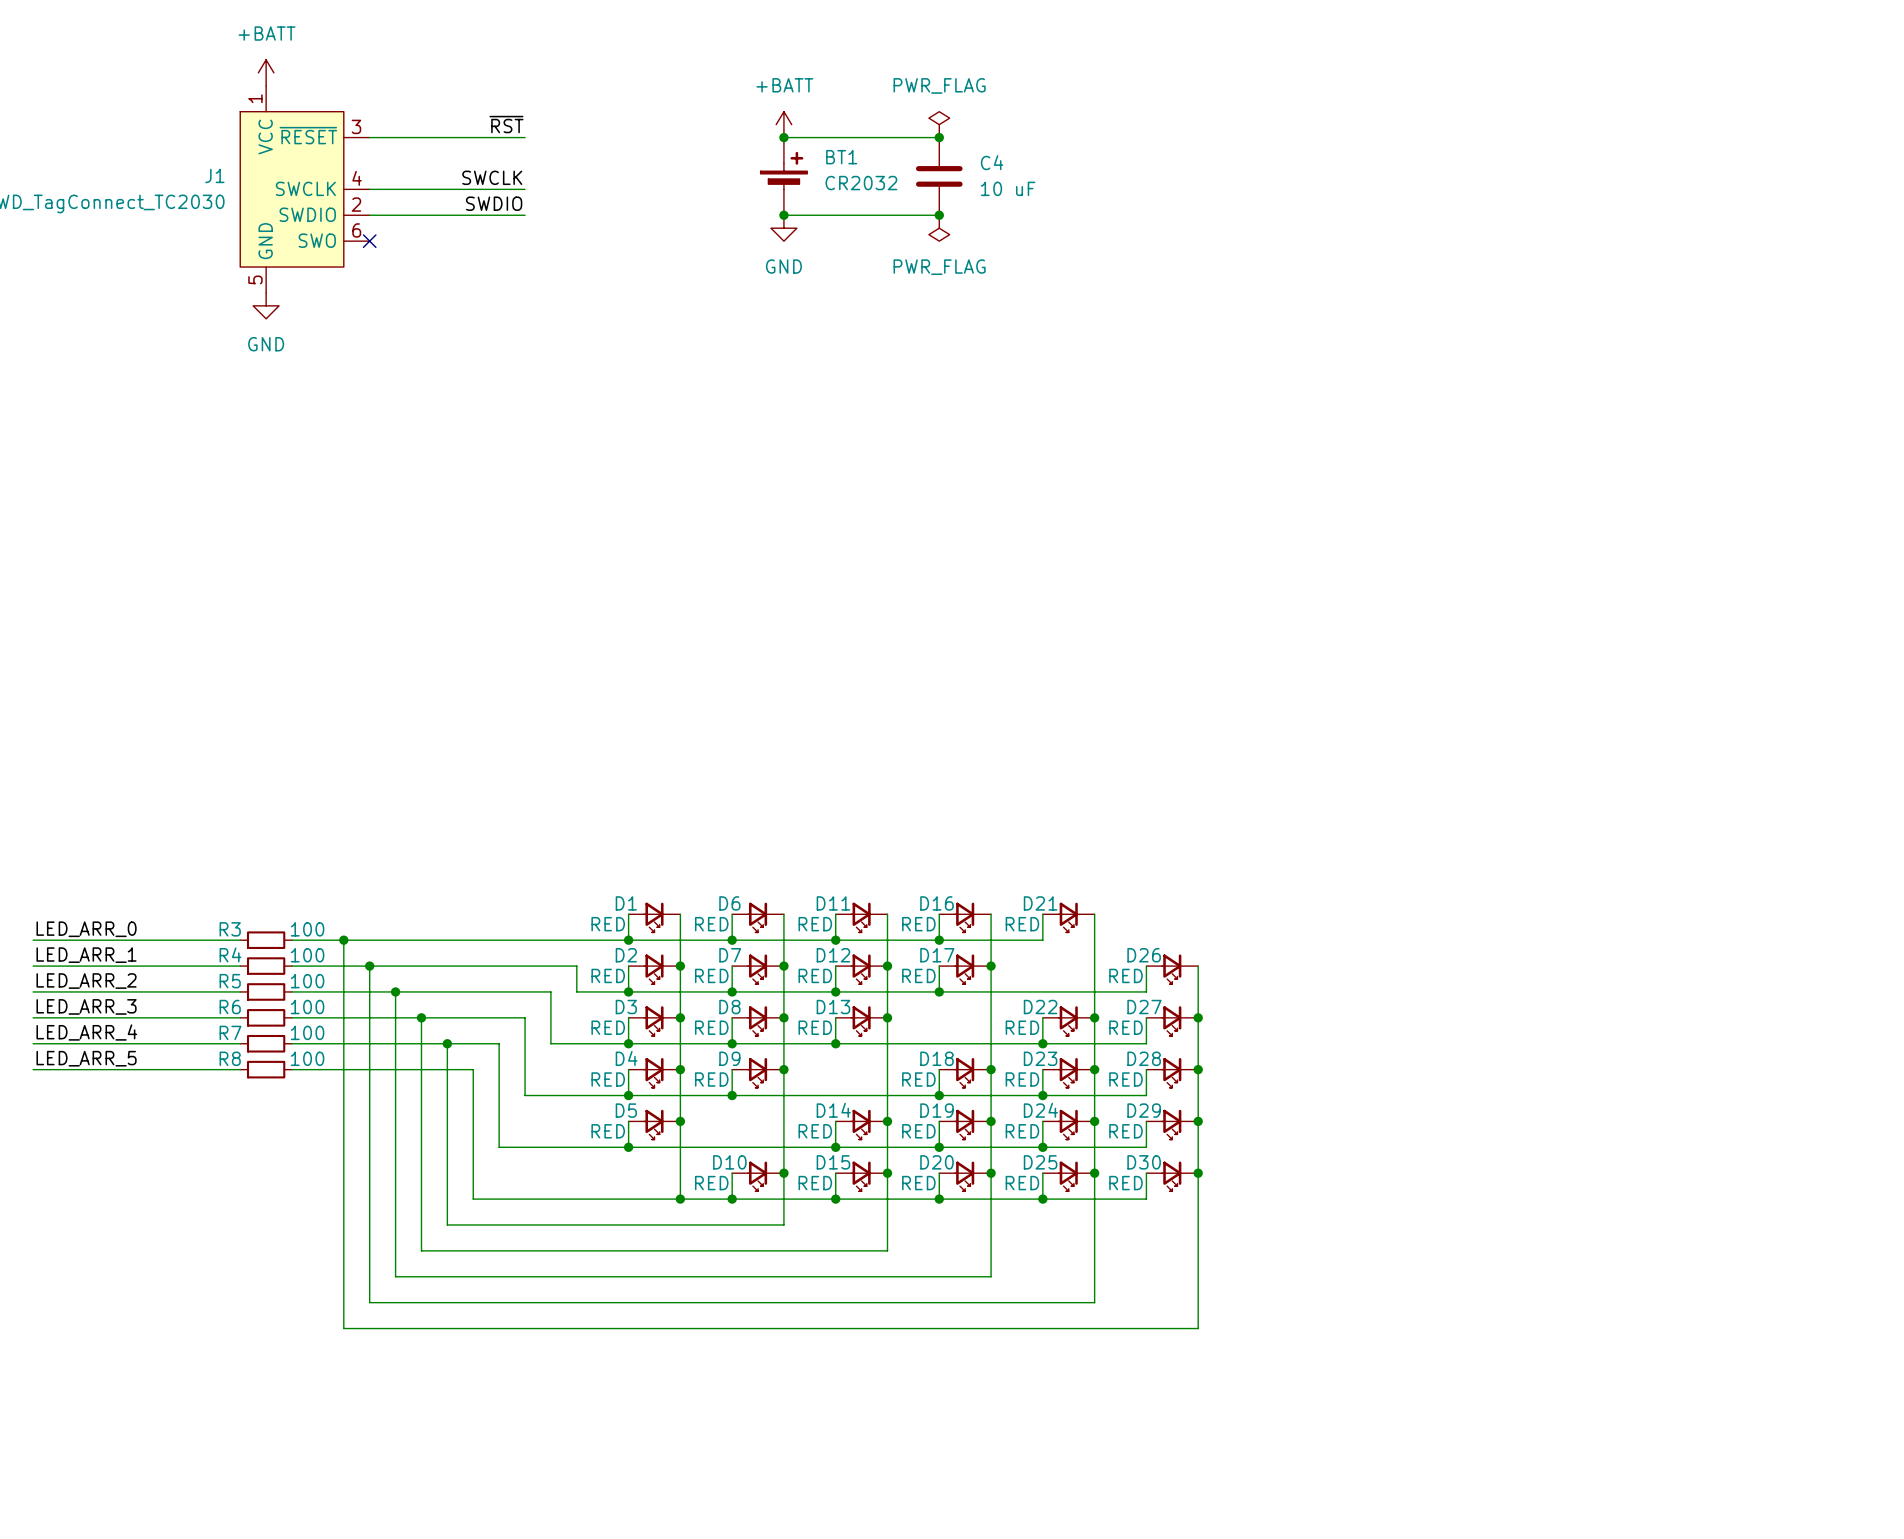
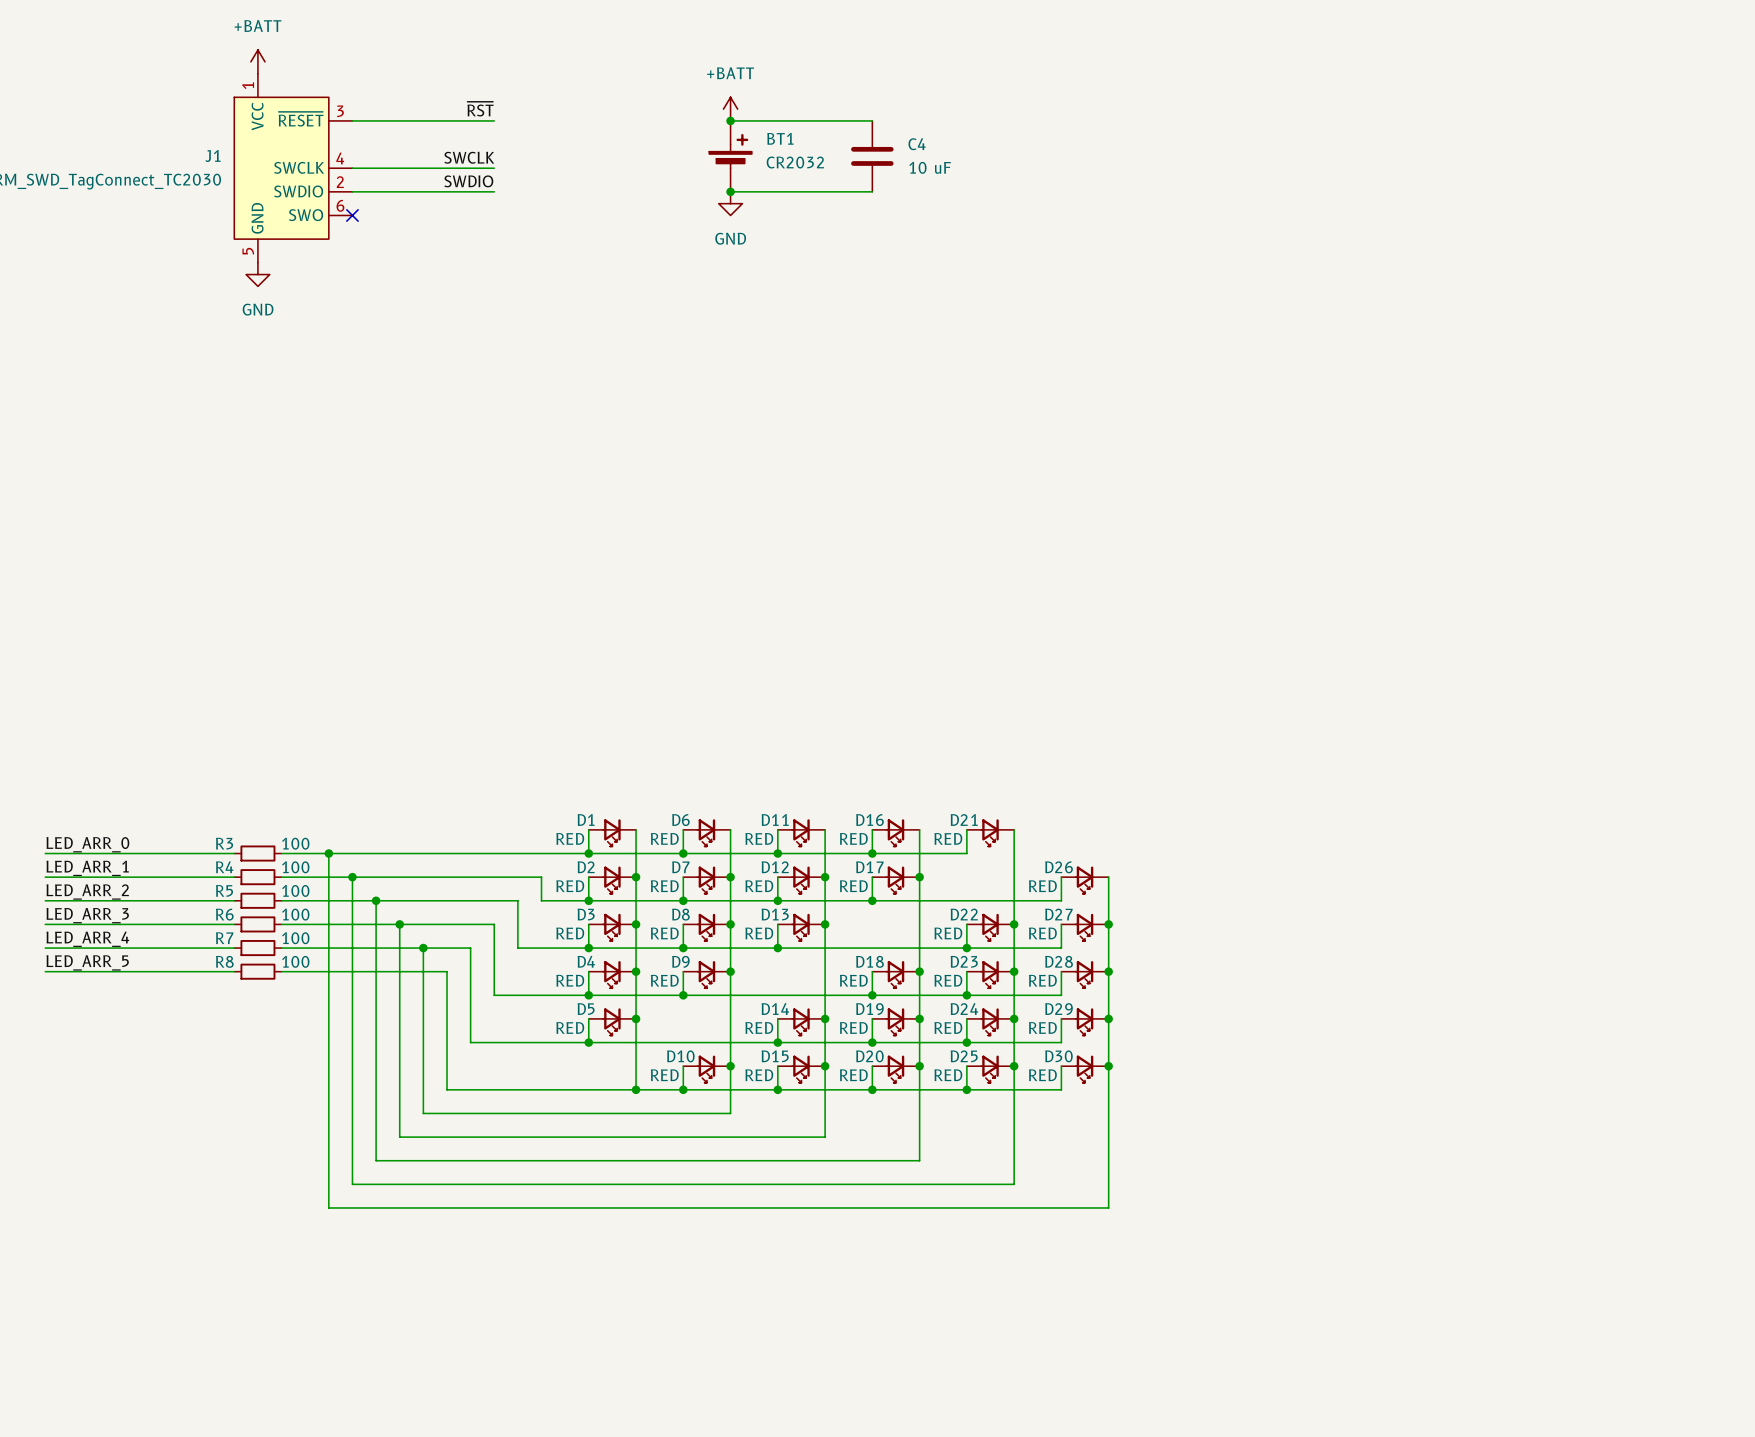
power symbol: PWR_FLAG (939, 124) -> none
junction: (939, 137) -> none
junction: (939, 215) -> none
power symbol: PWR_FLAG (939, 228) -> none

